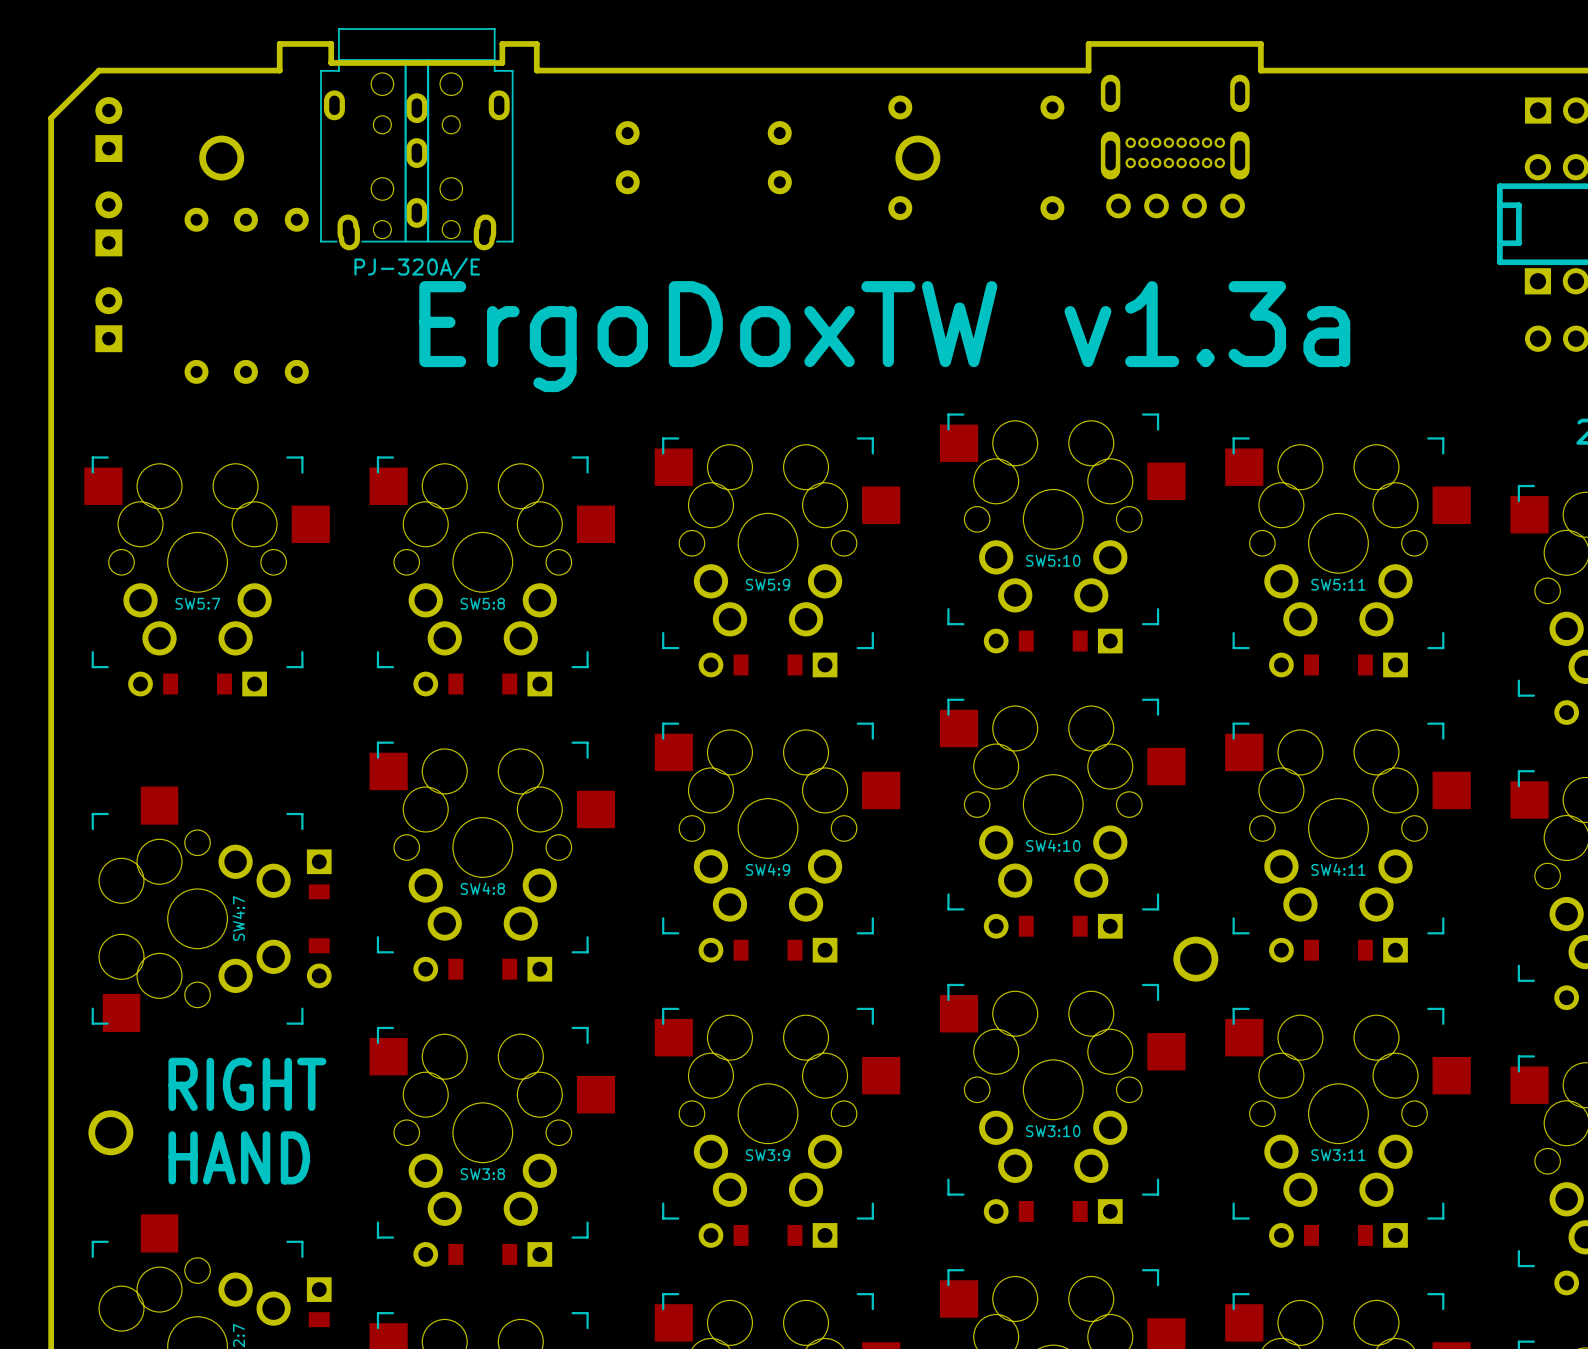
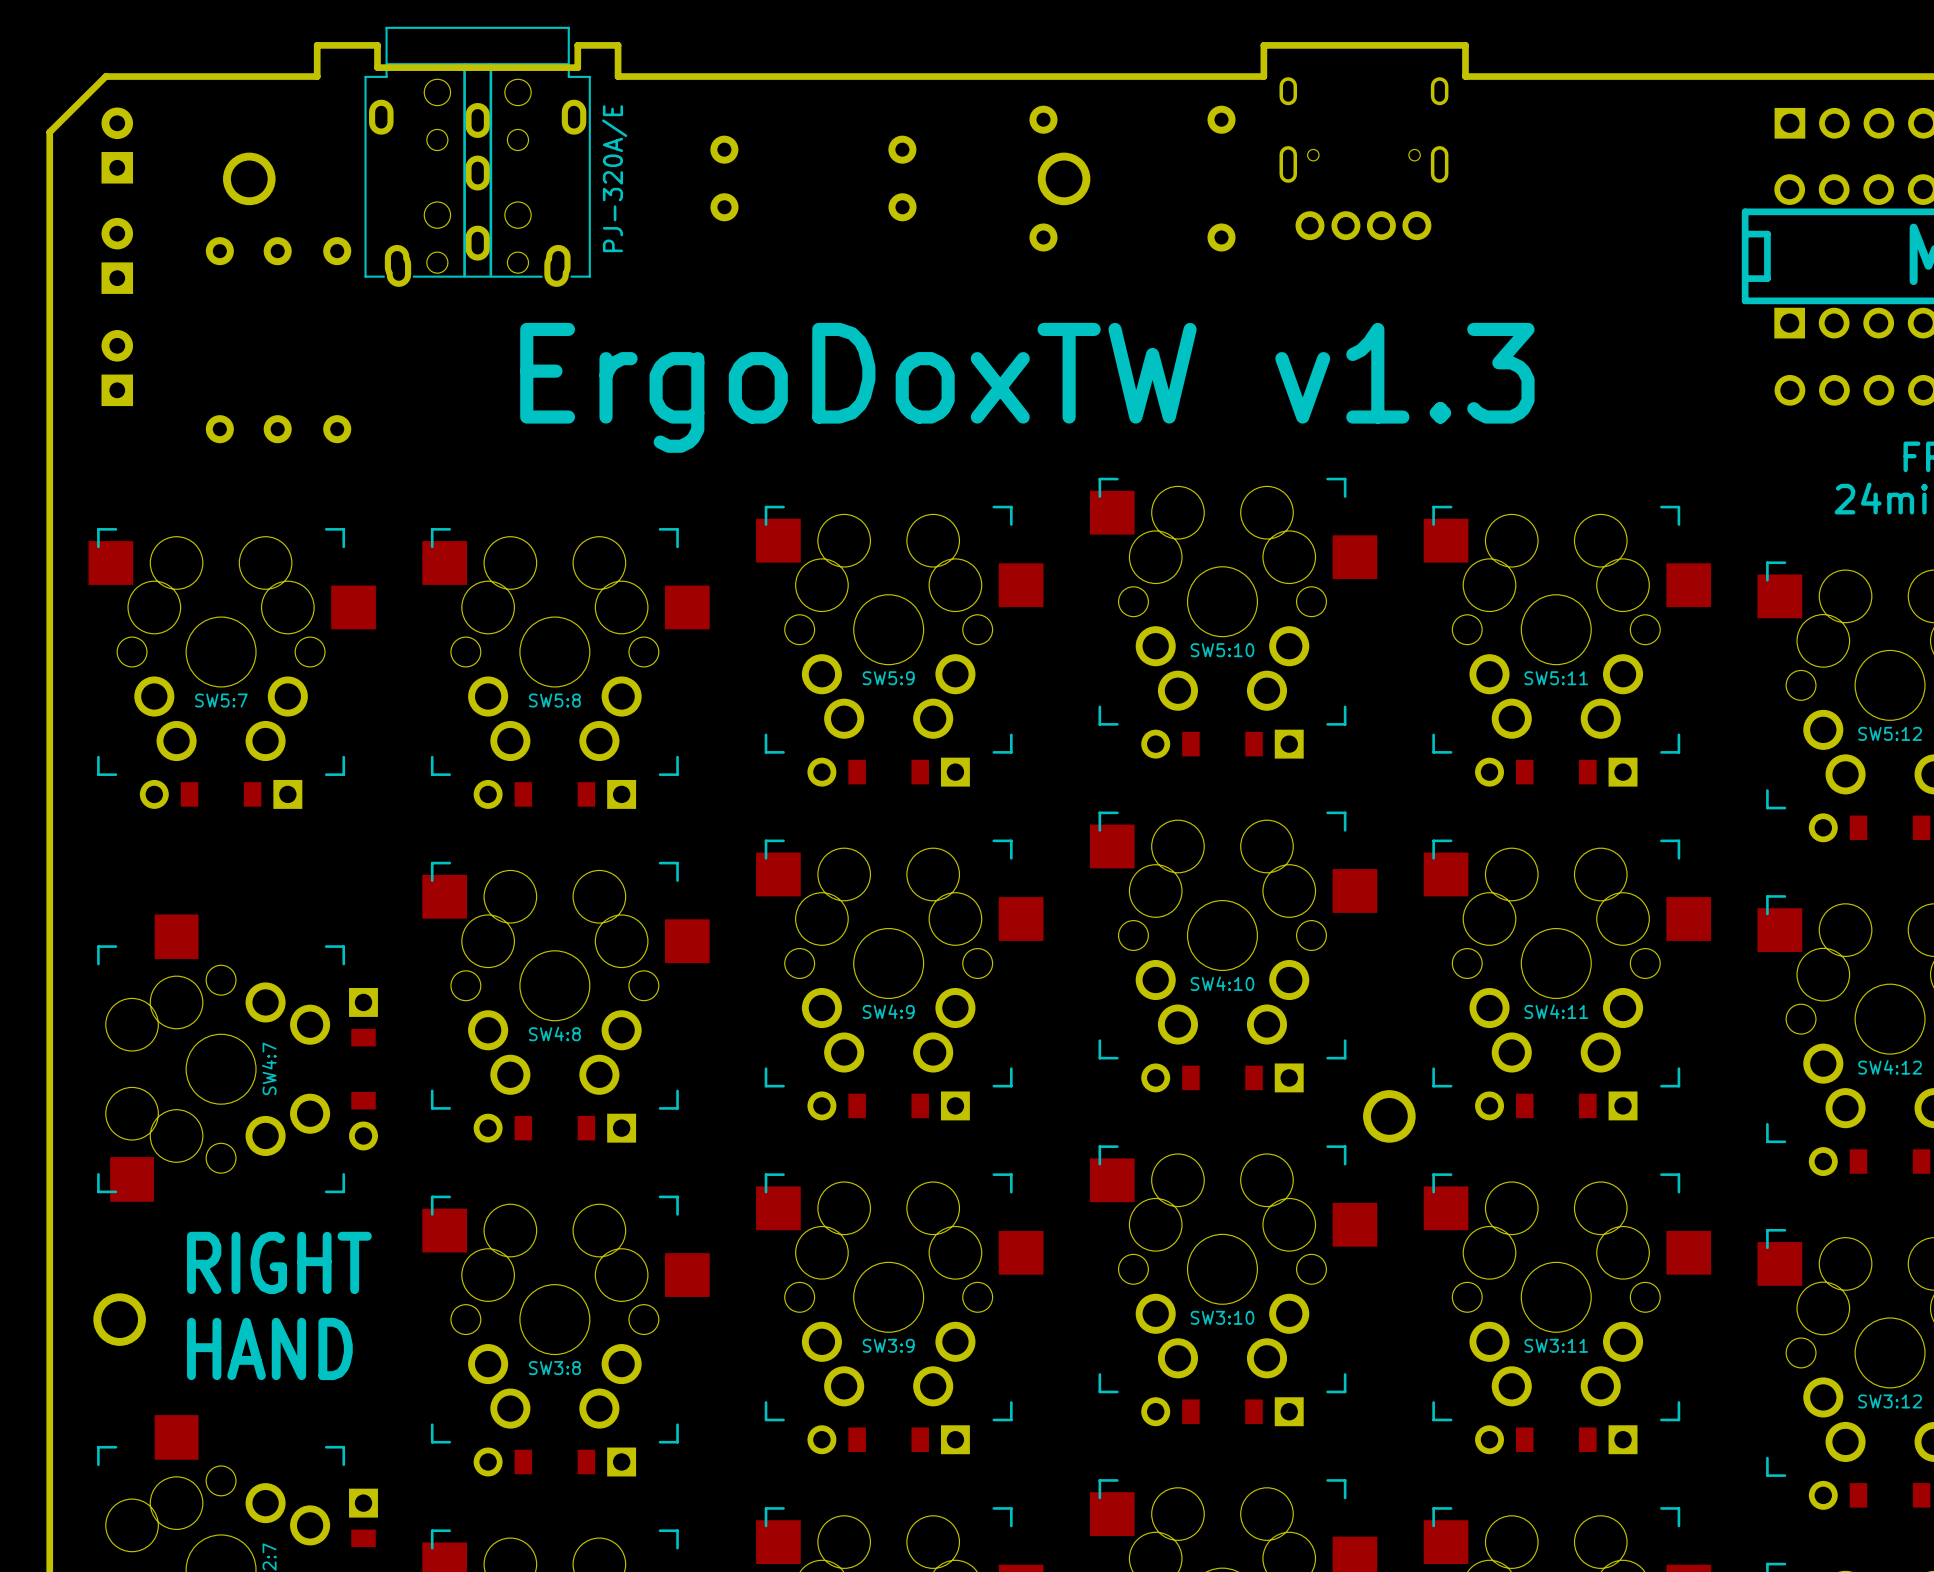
part footprint: [1100, 74, 1250, 219] -> [1279, 77, 1449, 241]
part text rotation: 0° (417, 268) -> 90° counterclockwise (614, 178)
part text position: PJ-320A/E (417, 268) -> PJ-320A/E (614, 178)
text: ErgoDoxTW v1.3a (884, 336) -> ErgoDoxTW v1.3 (1027, 387)

